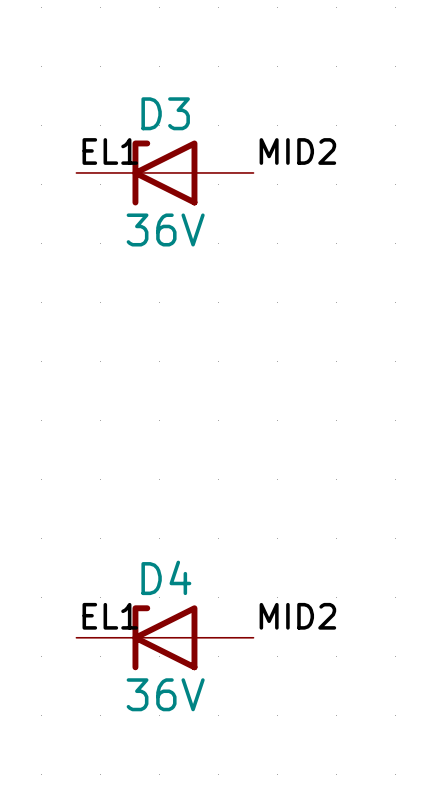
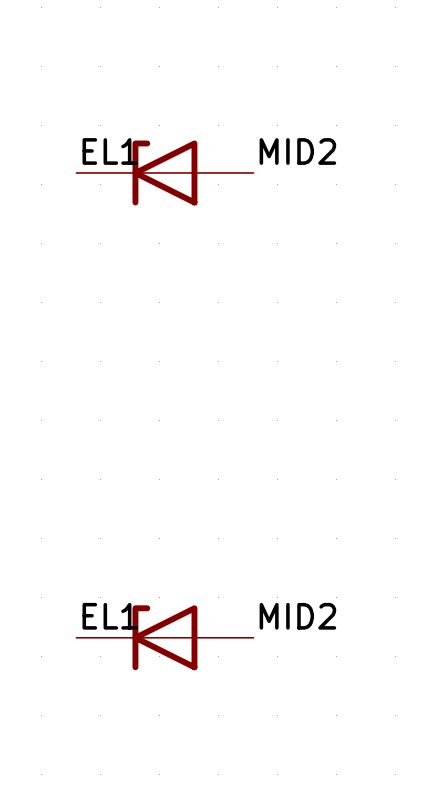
D3 name: D3 (165, 113) -> none
D3 value: 36V (165, 229) -> none
D4 name: D4 (166, 577) -> none
D4 value: 36V (165, 694) -> none

